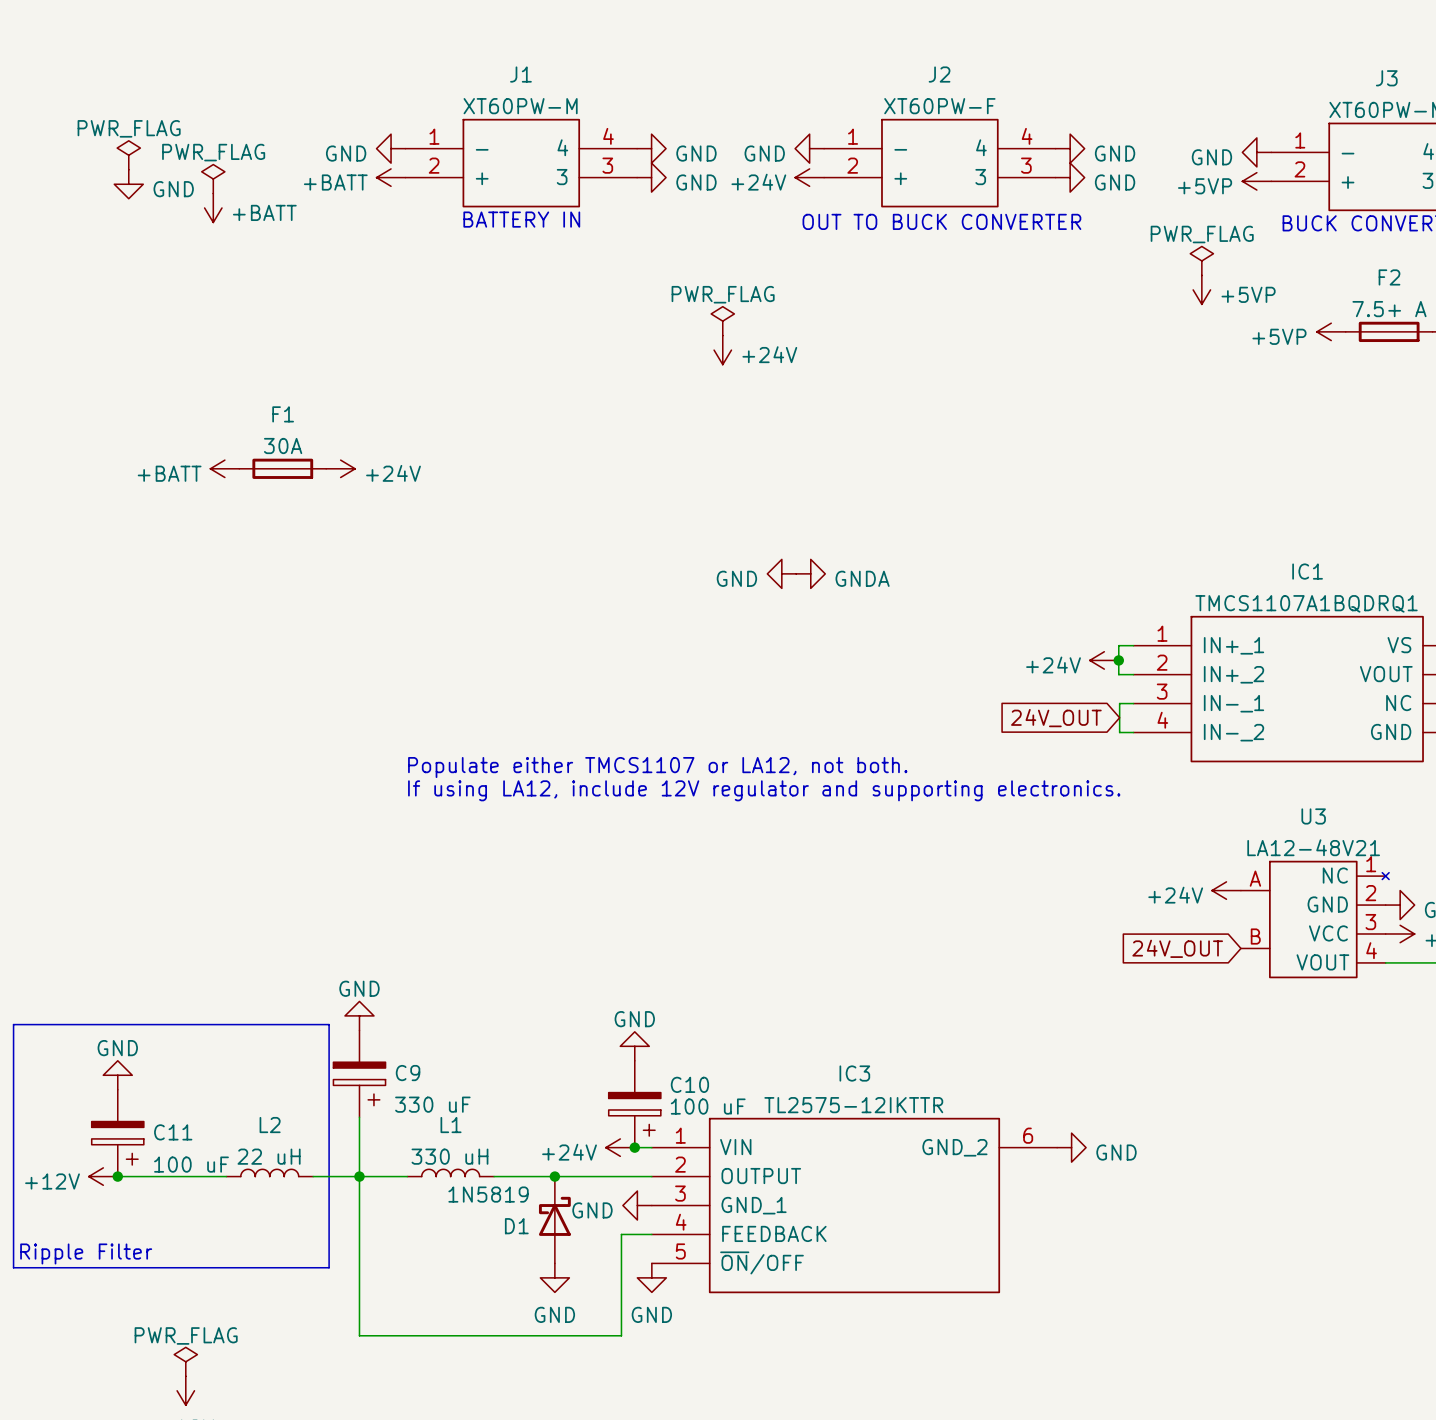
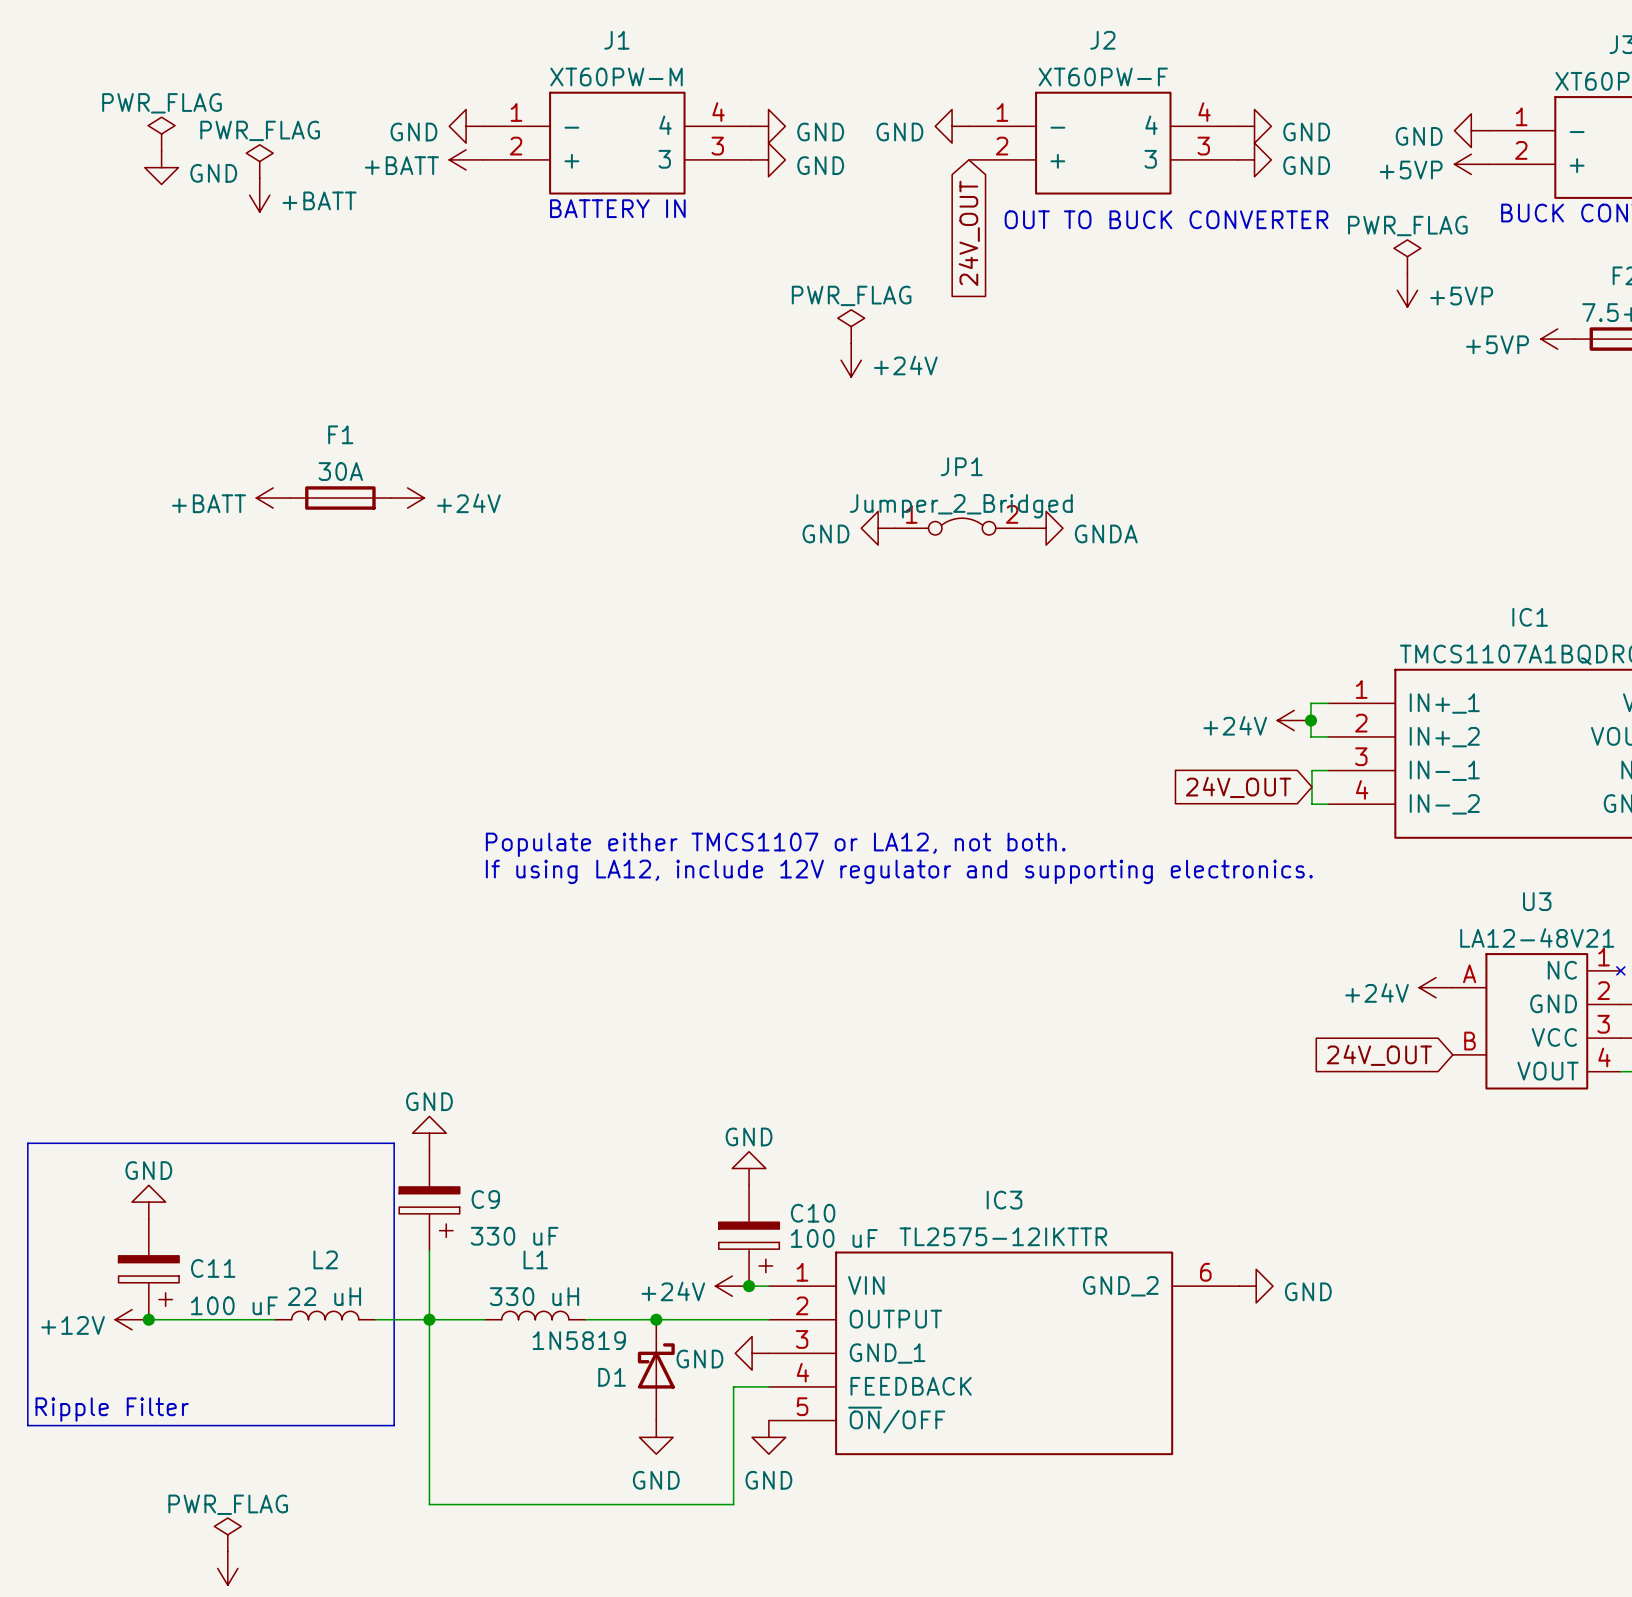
power symbol: +24V (809, 177) -> none
text position: OUT TO BUCK CONVERTER (941, 221) -> OUT TO BUCK CONVERTER (1166, 219)
global label: none -> 24V_OUT (969, 233)
JP1: none -> Jumper_2_Bridged (962, 526)
power symbol position: GND (781, 573) -> GND (878, 528)
power symbol position: GNDA (810, 573) -> GNDA (1046, 528)

